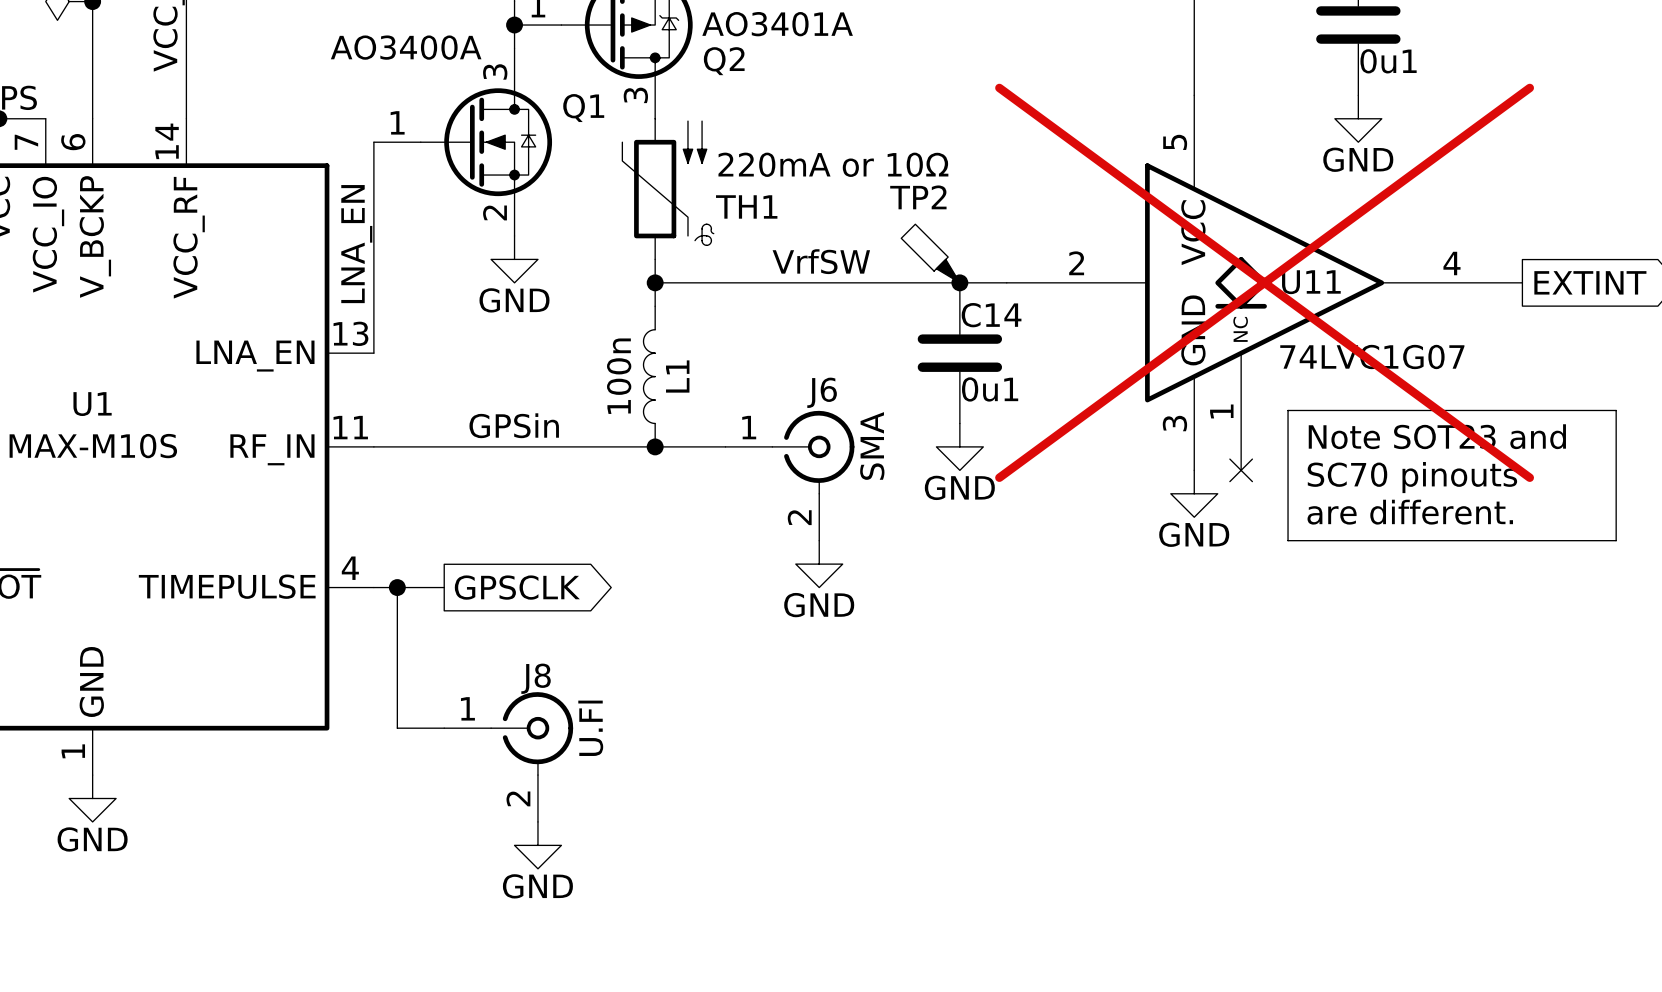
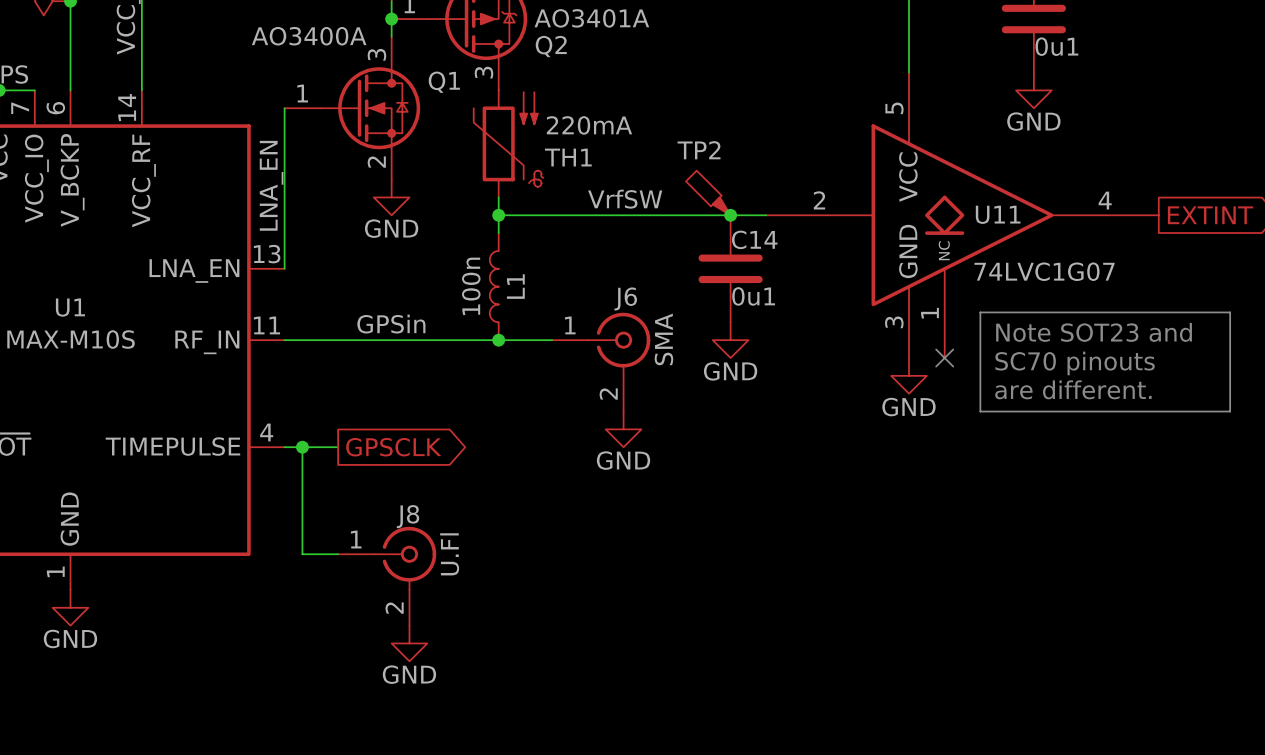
TH1 value: 220mA or 10Ω (833, 164) -> 220mA (589, 125)
U11 do-not-place cross: (1264, 282) -> none

